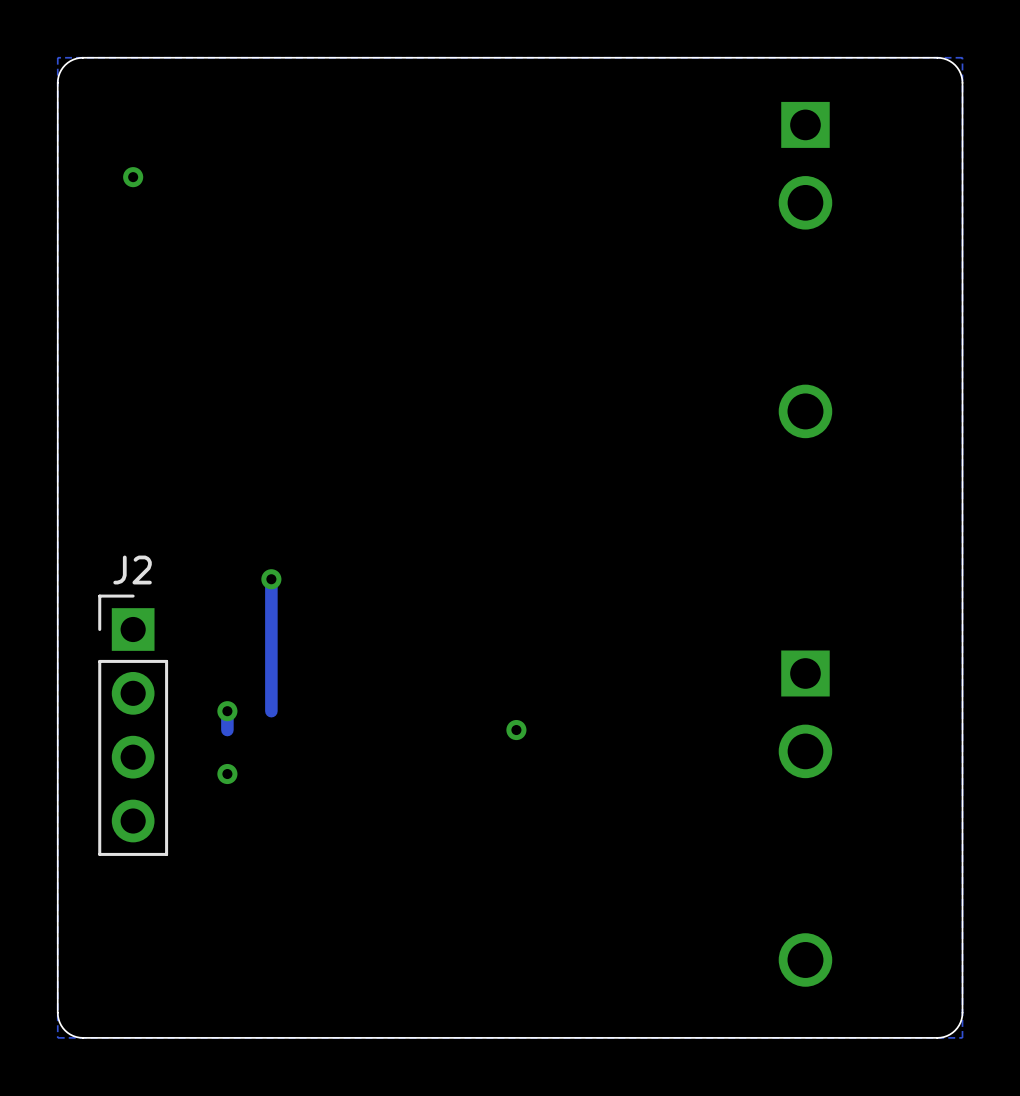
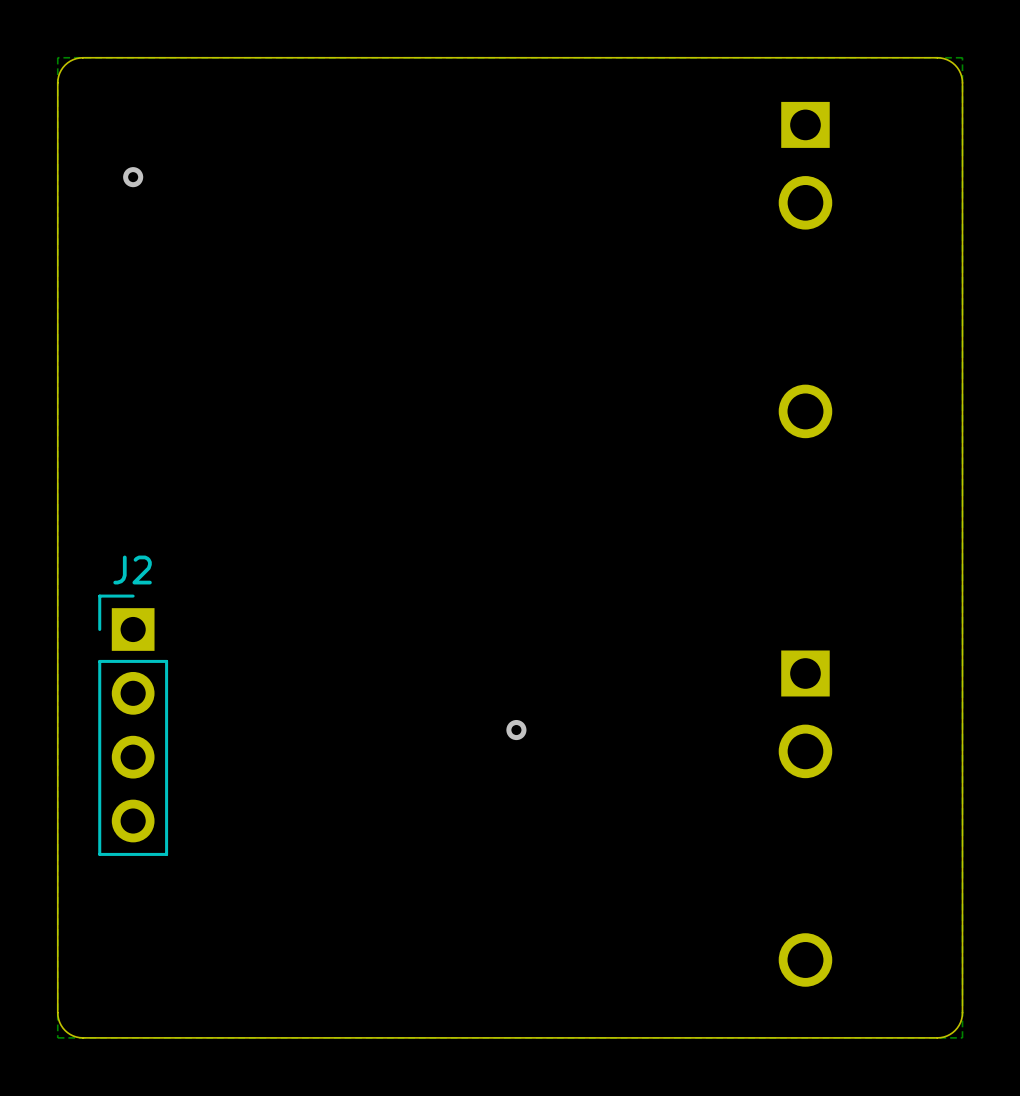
track: (271, 579) (271, 711) -> none
via: (271, 579) -> none
track: (227, 711) (227, 730) -> none
via: (227, 711) -> none
via: (227, 774) -> none

